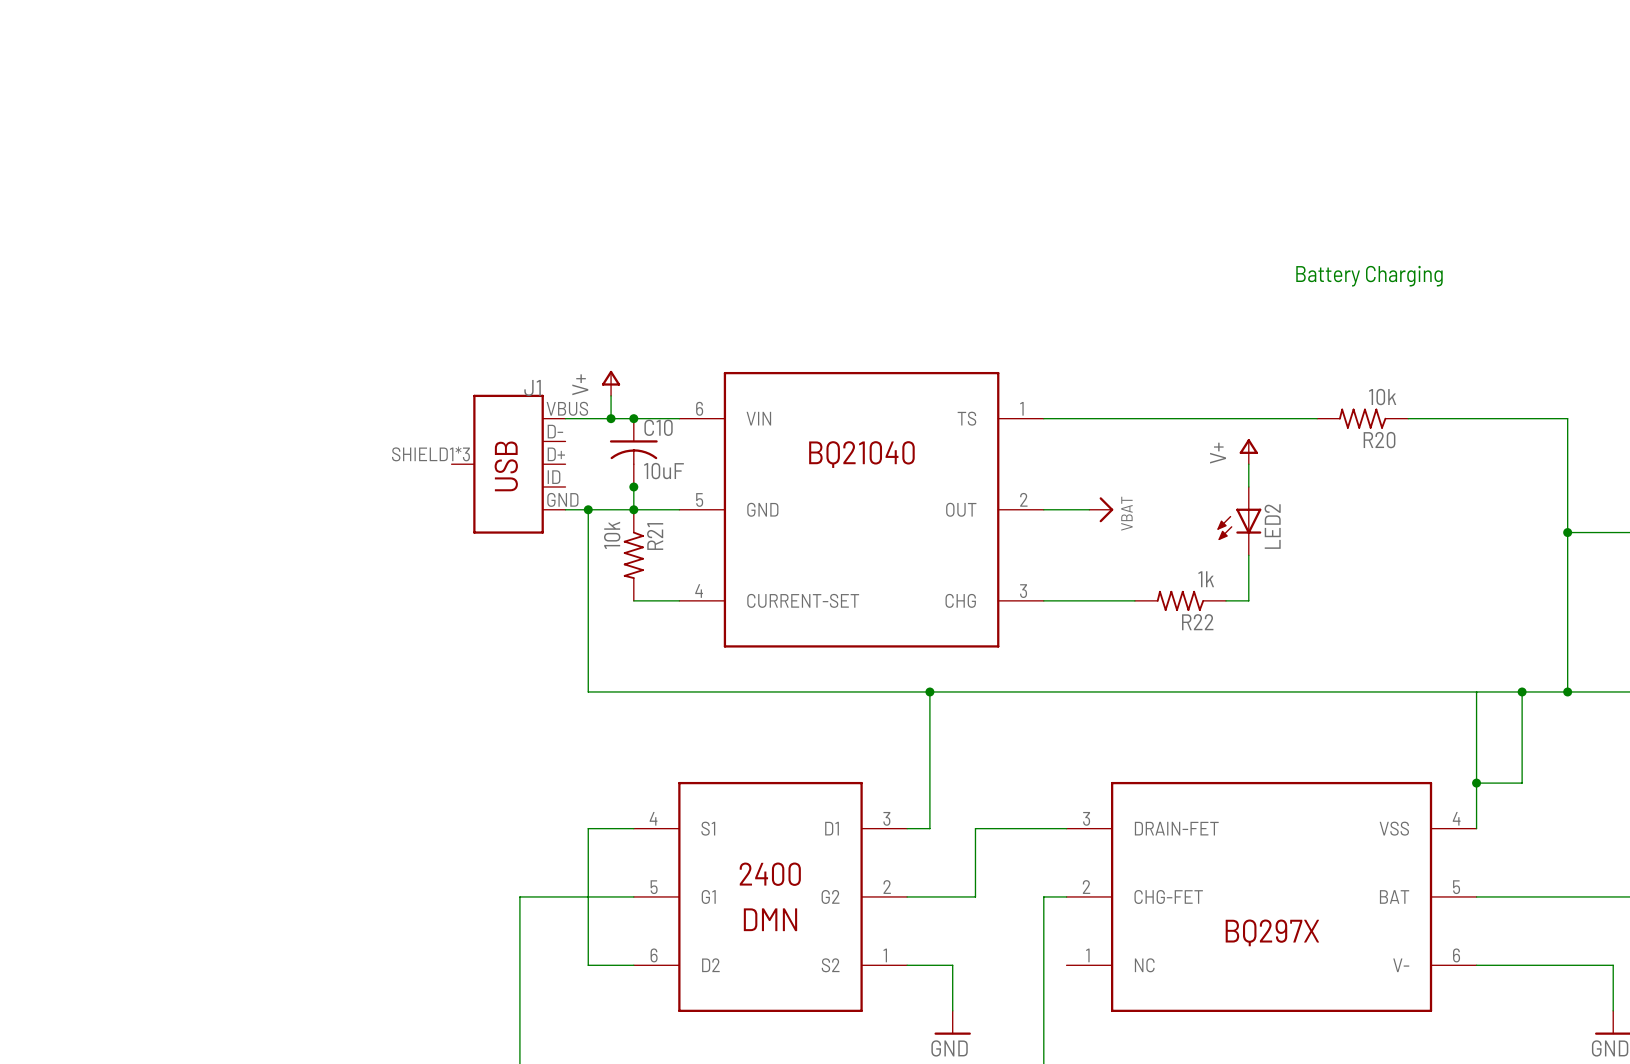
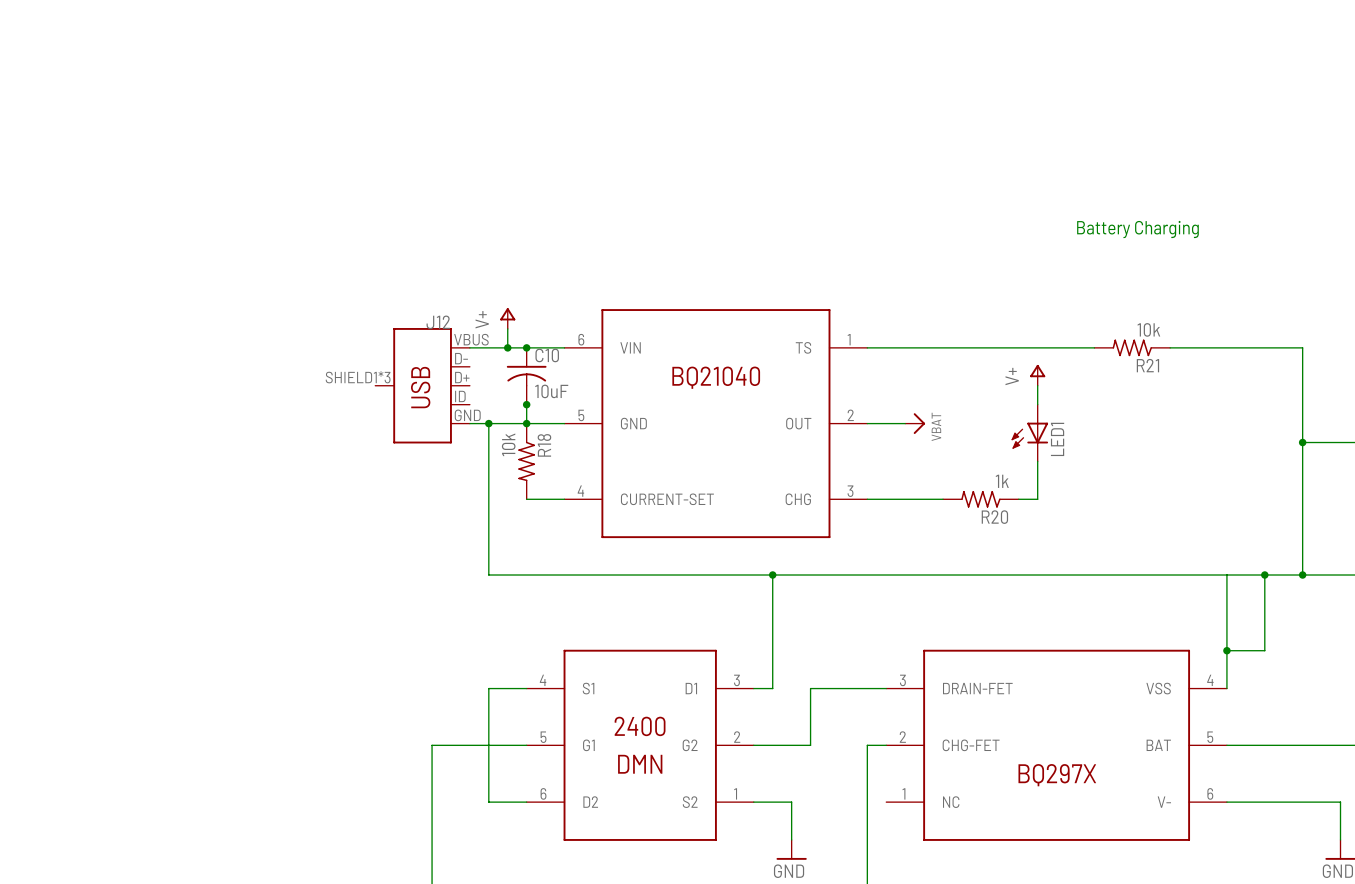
J1 name: J1 (532, 388) -> J12 (438, 322)
R20 name: R20 (1379, 440) -> R21 (1147, 365)
LED2 name: LED2 (1272, 526) -> LED1 (1057, 439)
R21 name: R21 (655, 536) -> R18 (544, 445)
R22 name: R22 (1197, 622) -> R20 (994, 517)

